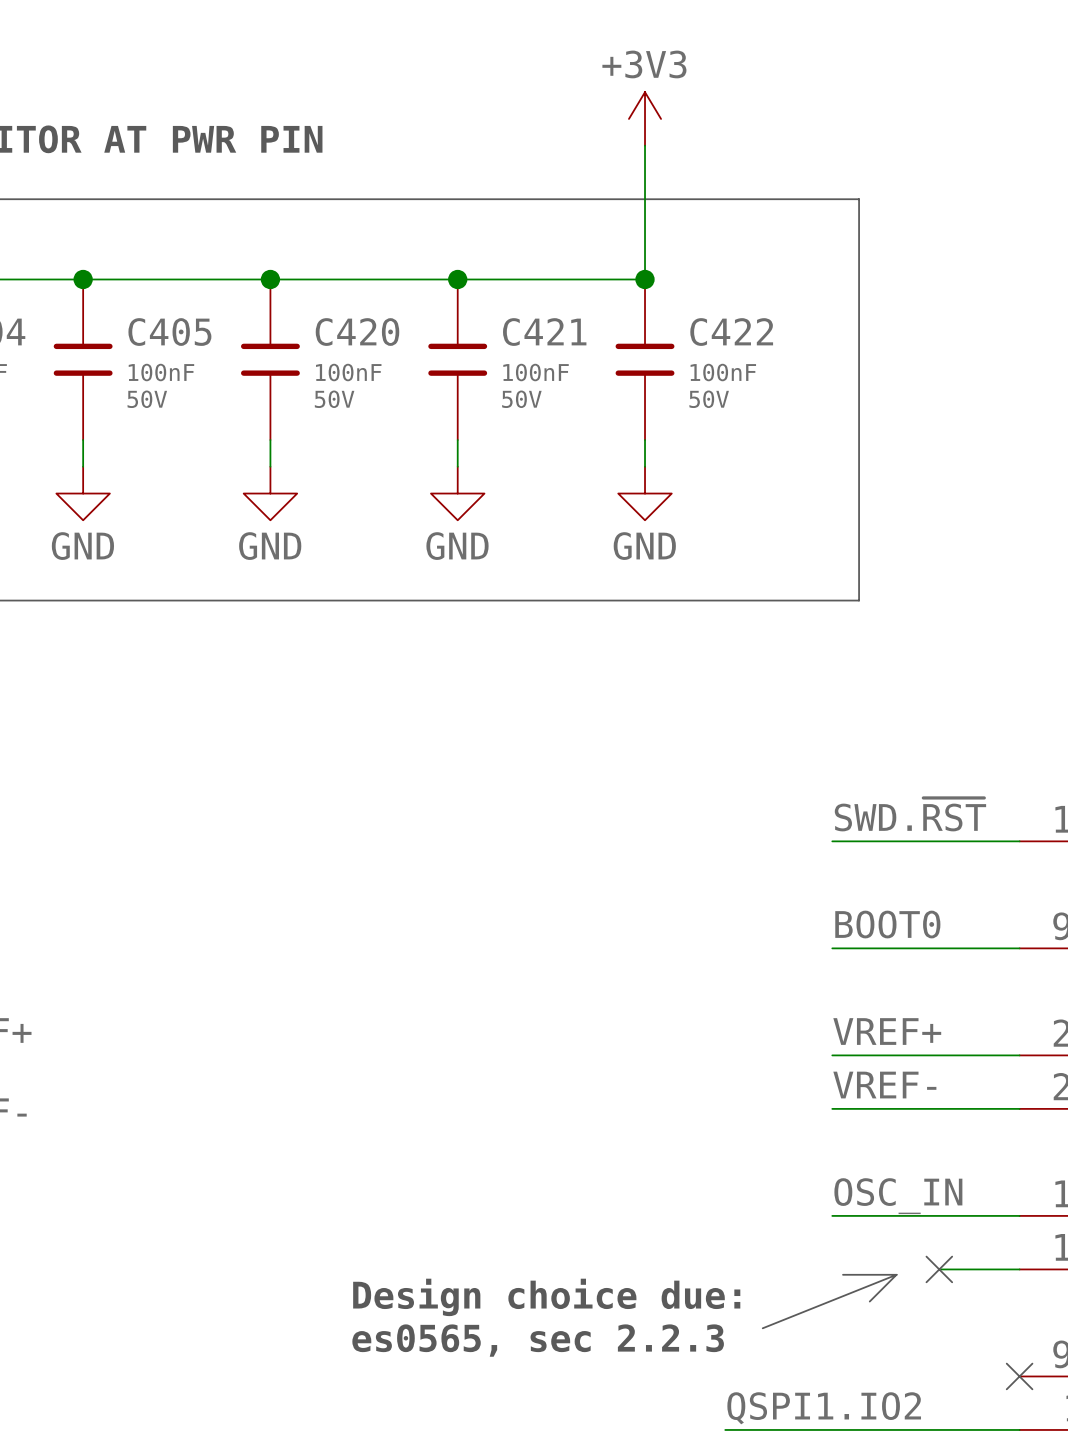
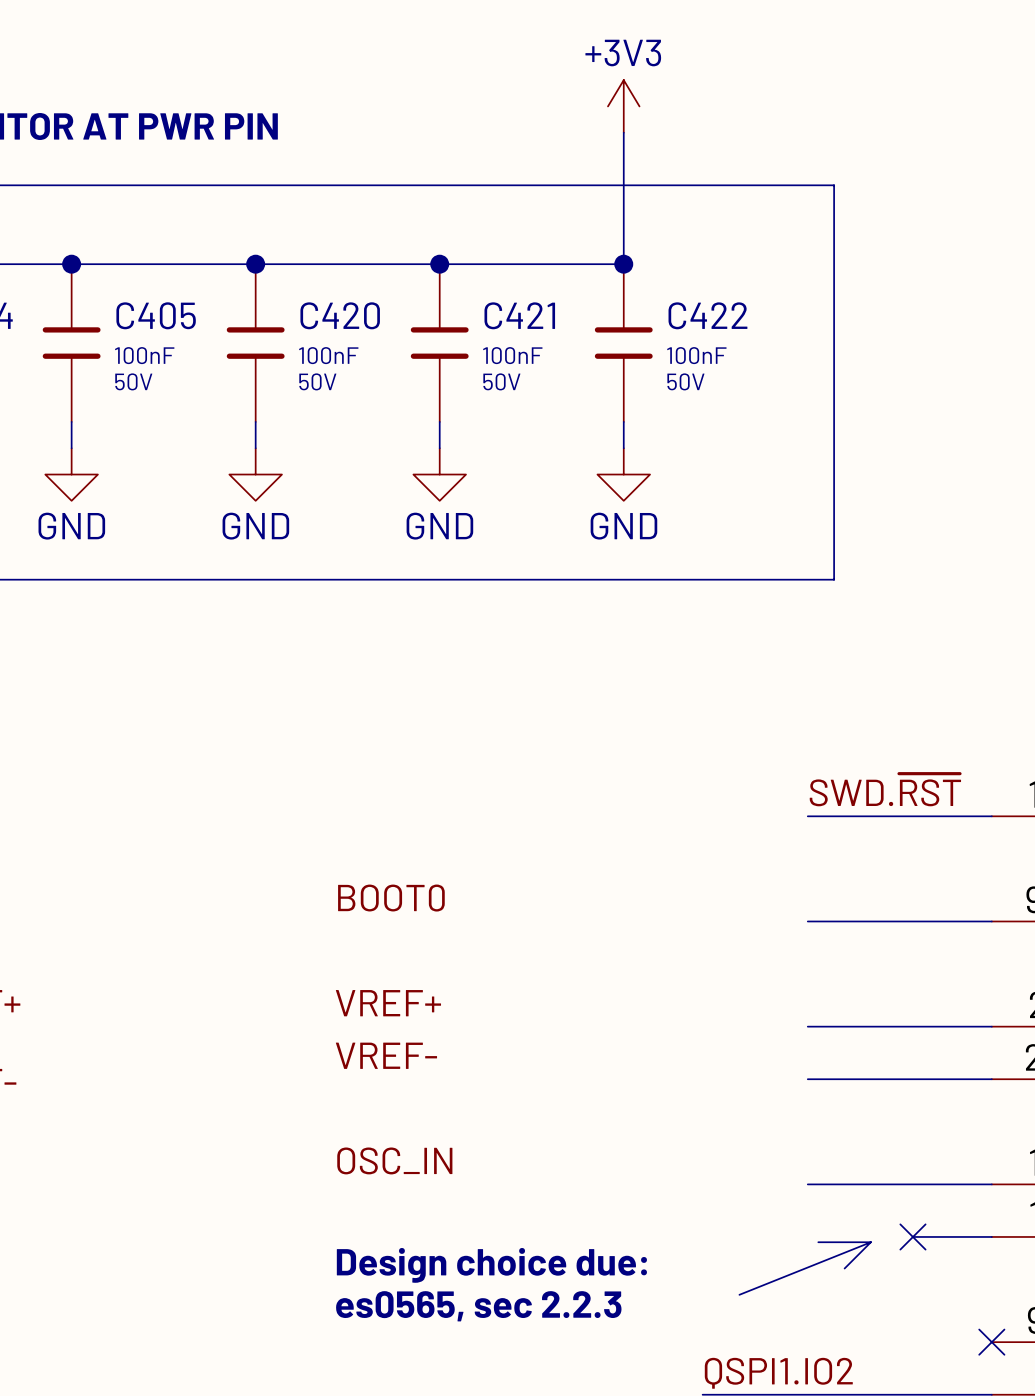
label position: BOOT0 (887, 924) -> BOOT0 (391, 898)
label position: VREF+ (887, 1031) -> VREF+ (388, 1003)
label position: VREF- (884, 1085) -> VREF- (386, 1055)
label position: OSC_IN (898, 1196) -> OSC_IN (394, 1160)

